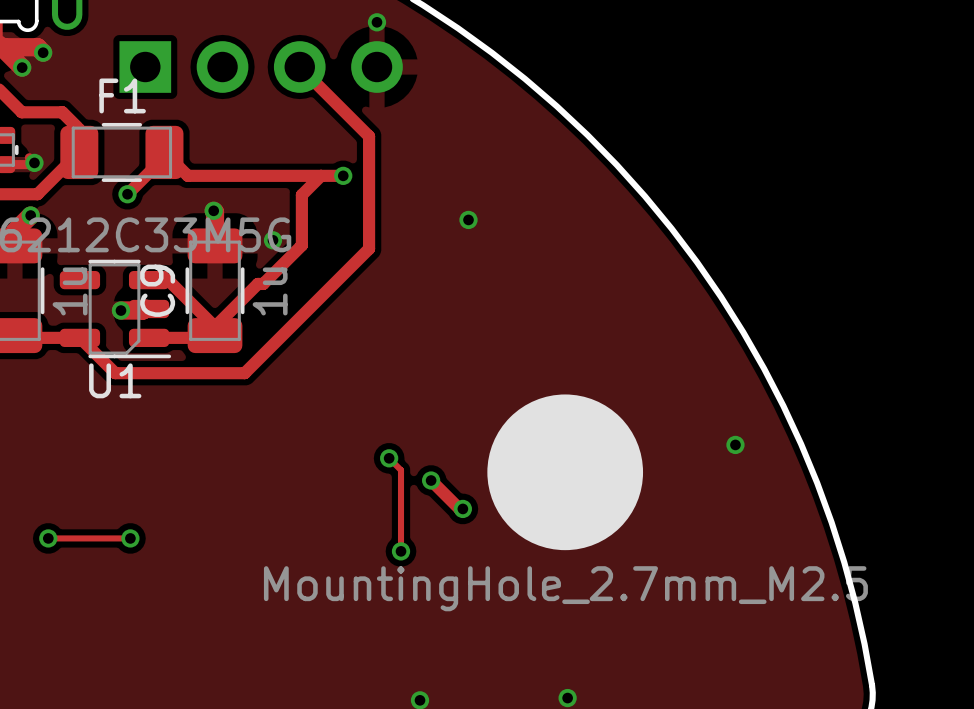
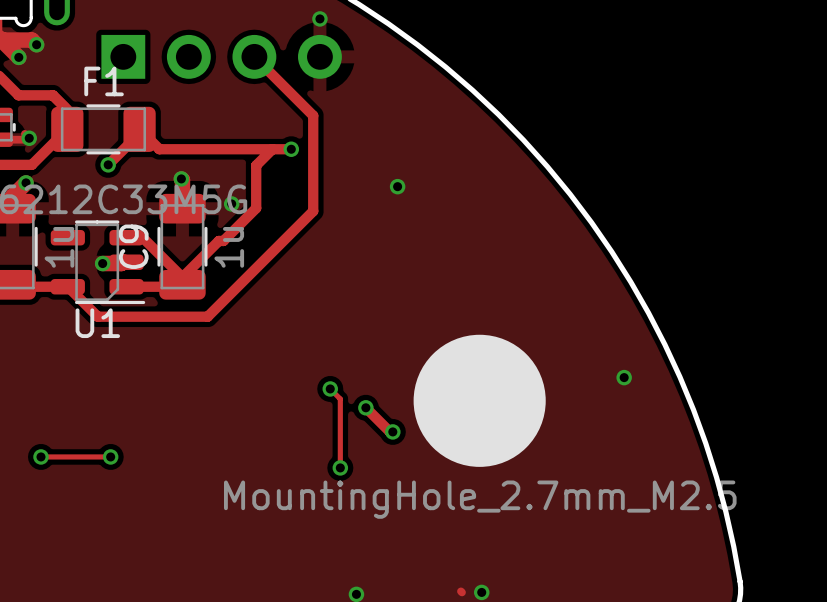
track: none -> (460, 591) (461, 592)

